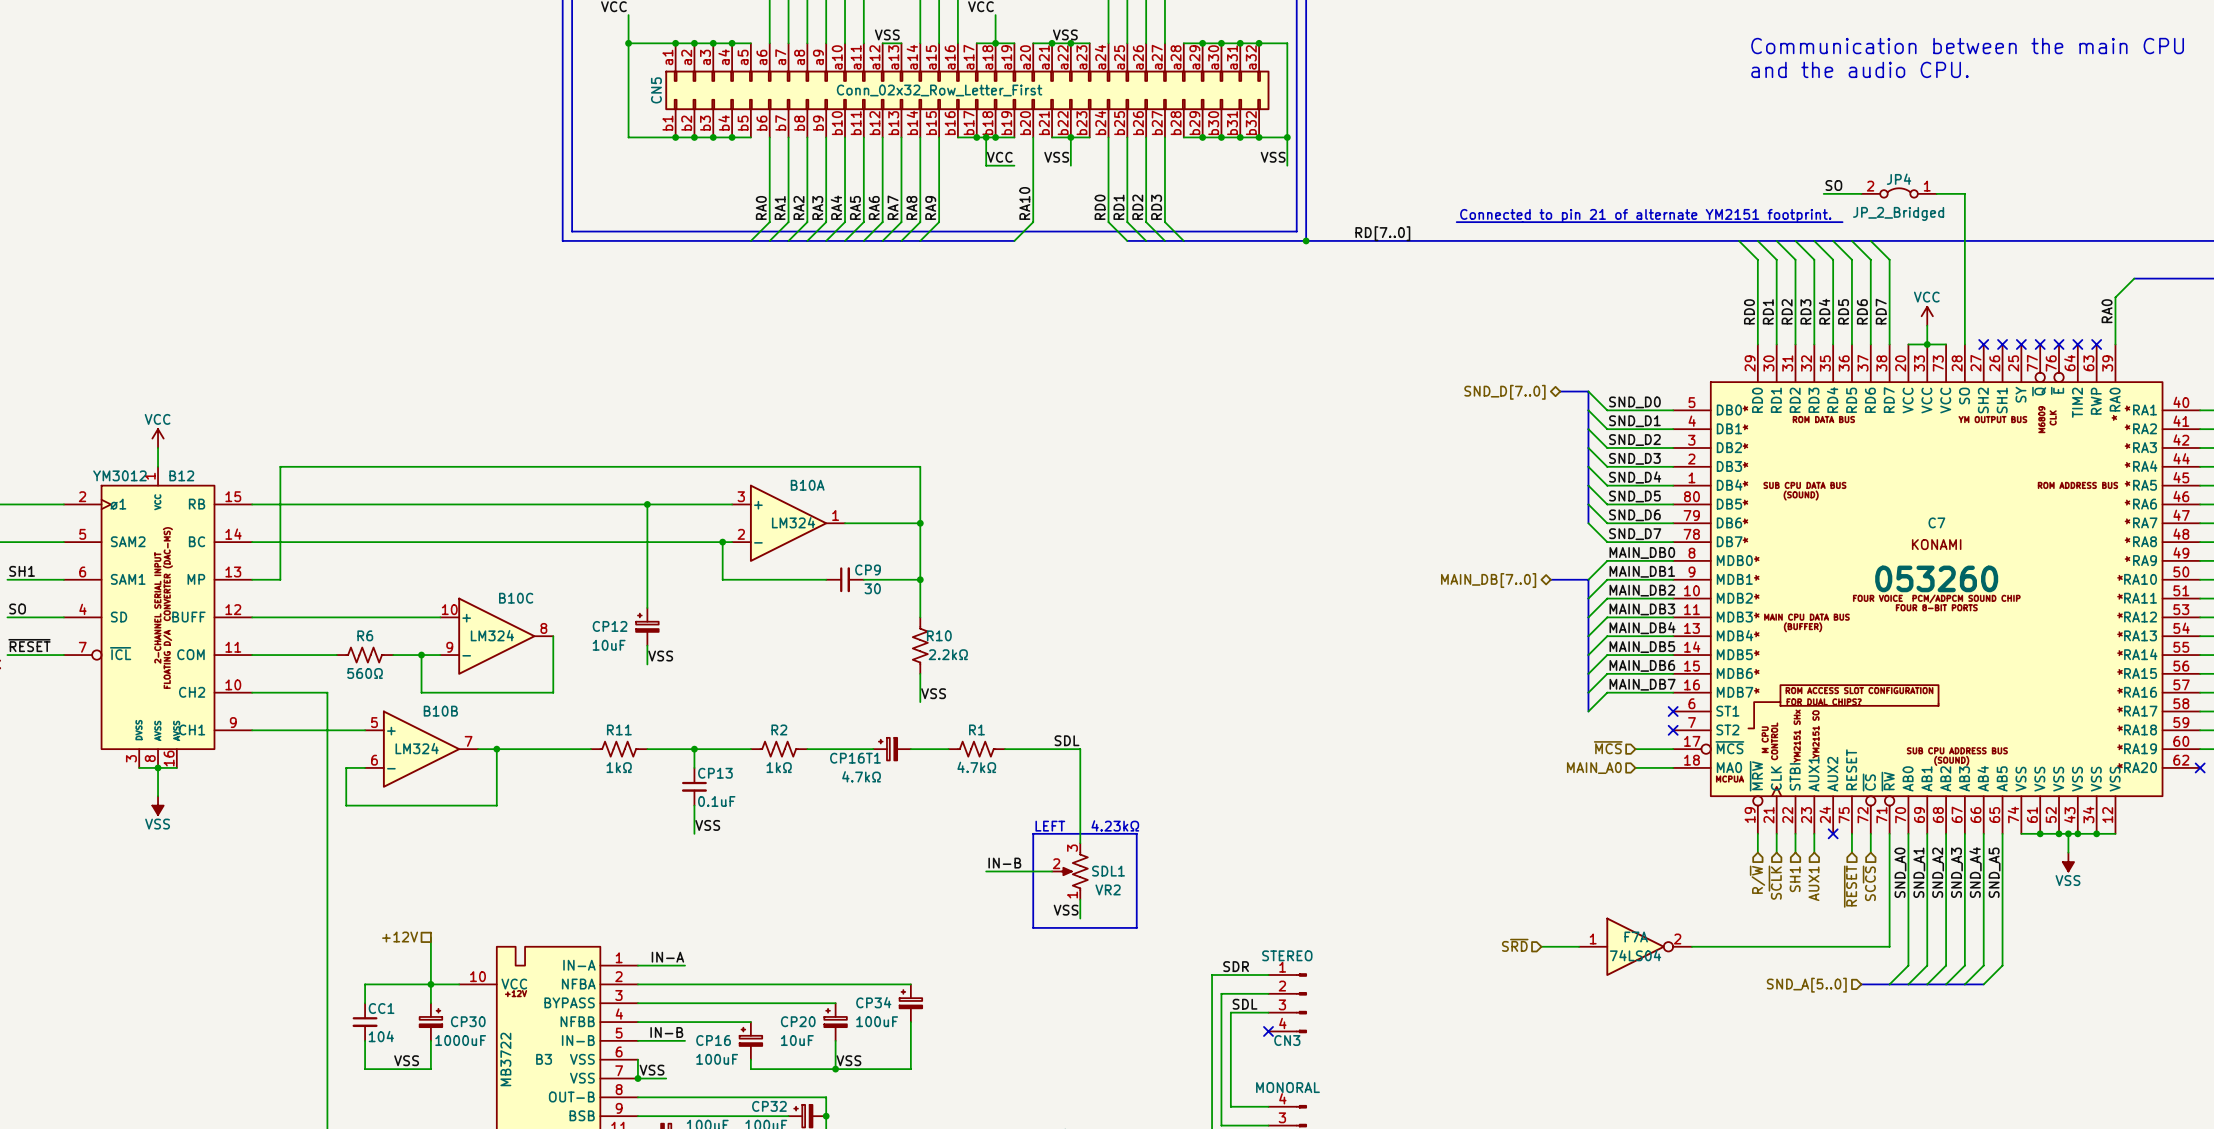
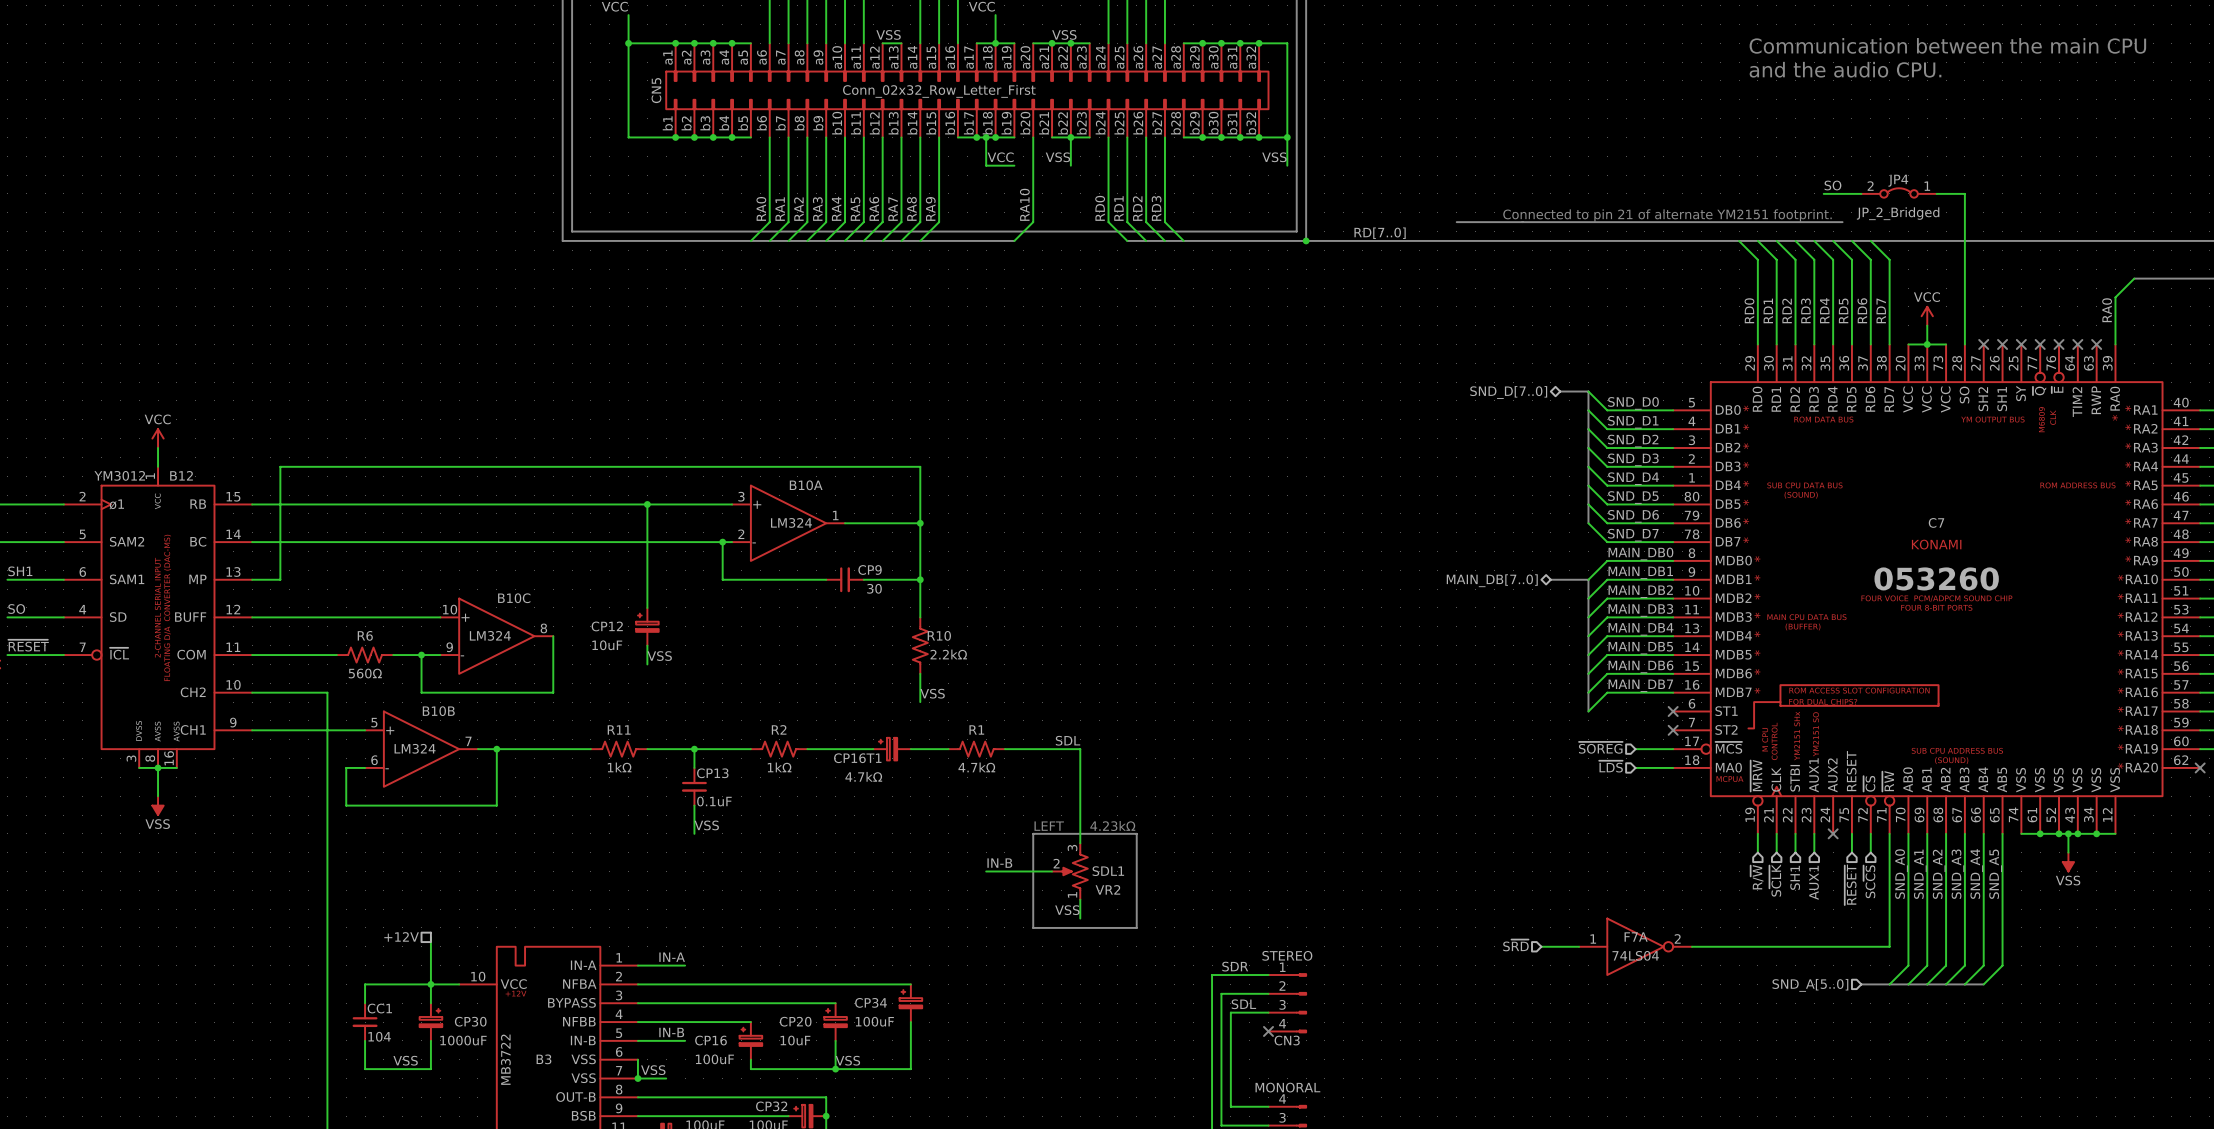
hierarchical label: ~{MCS} (1608, 747) -> ~{SOREG} (1600, 747)
hierarchical label: MAIN_A0 (1594, 768) -> ~{LDS} (1611, 766)

